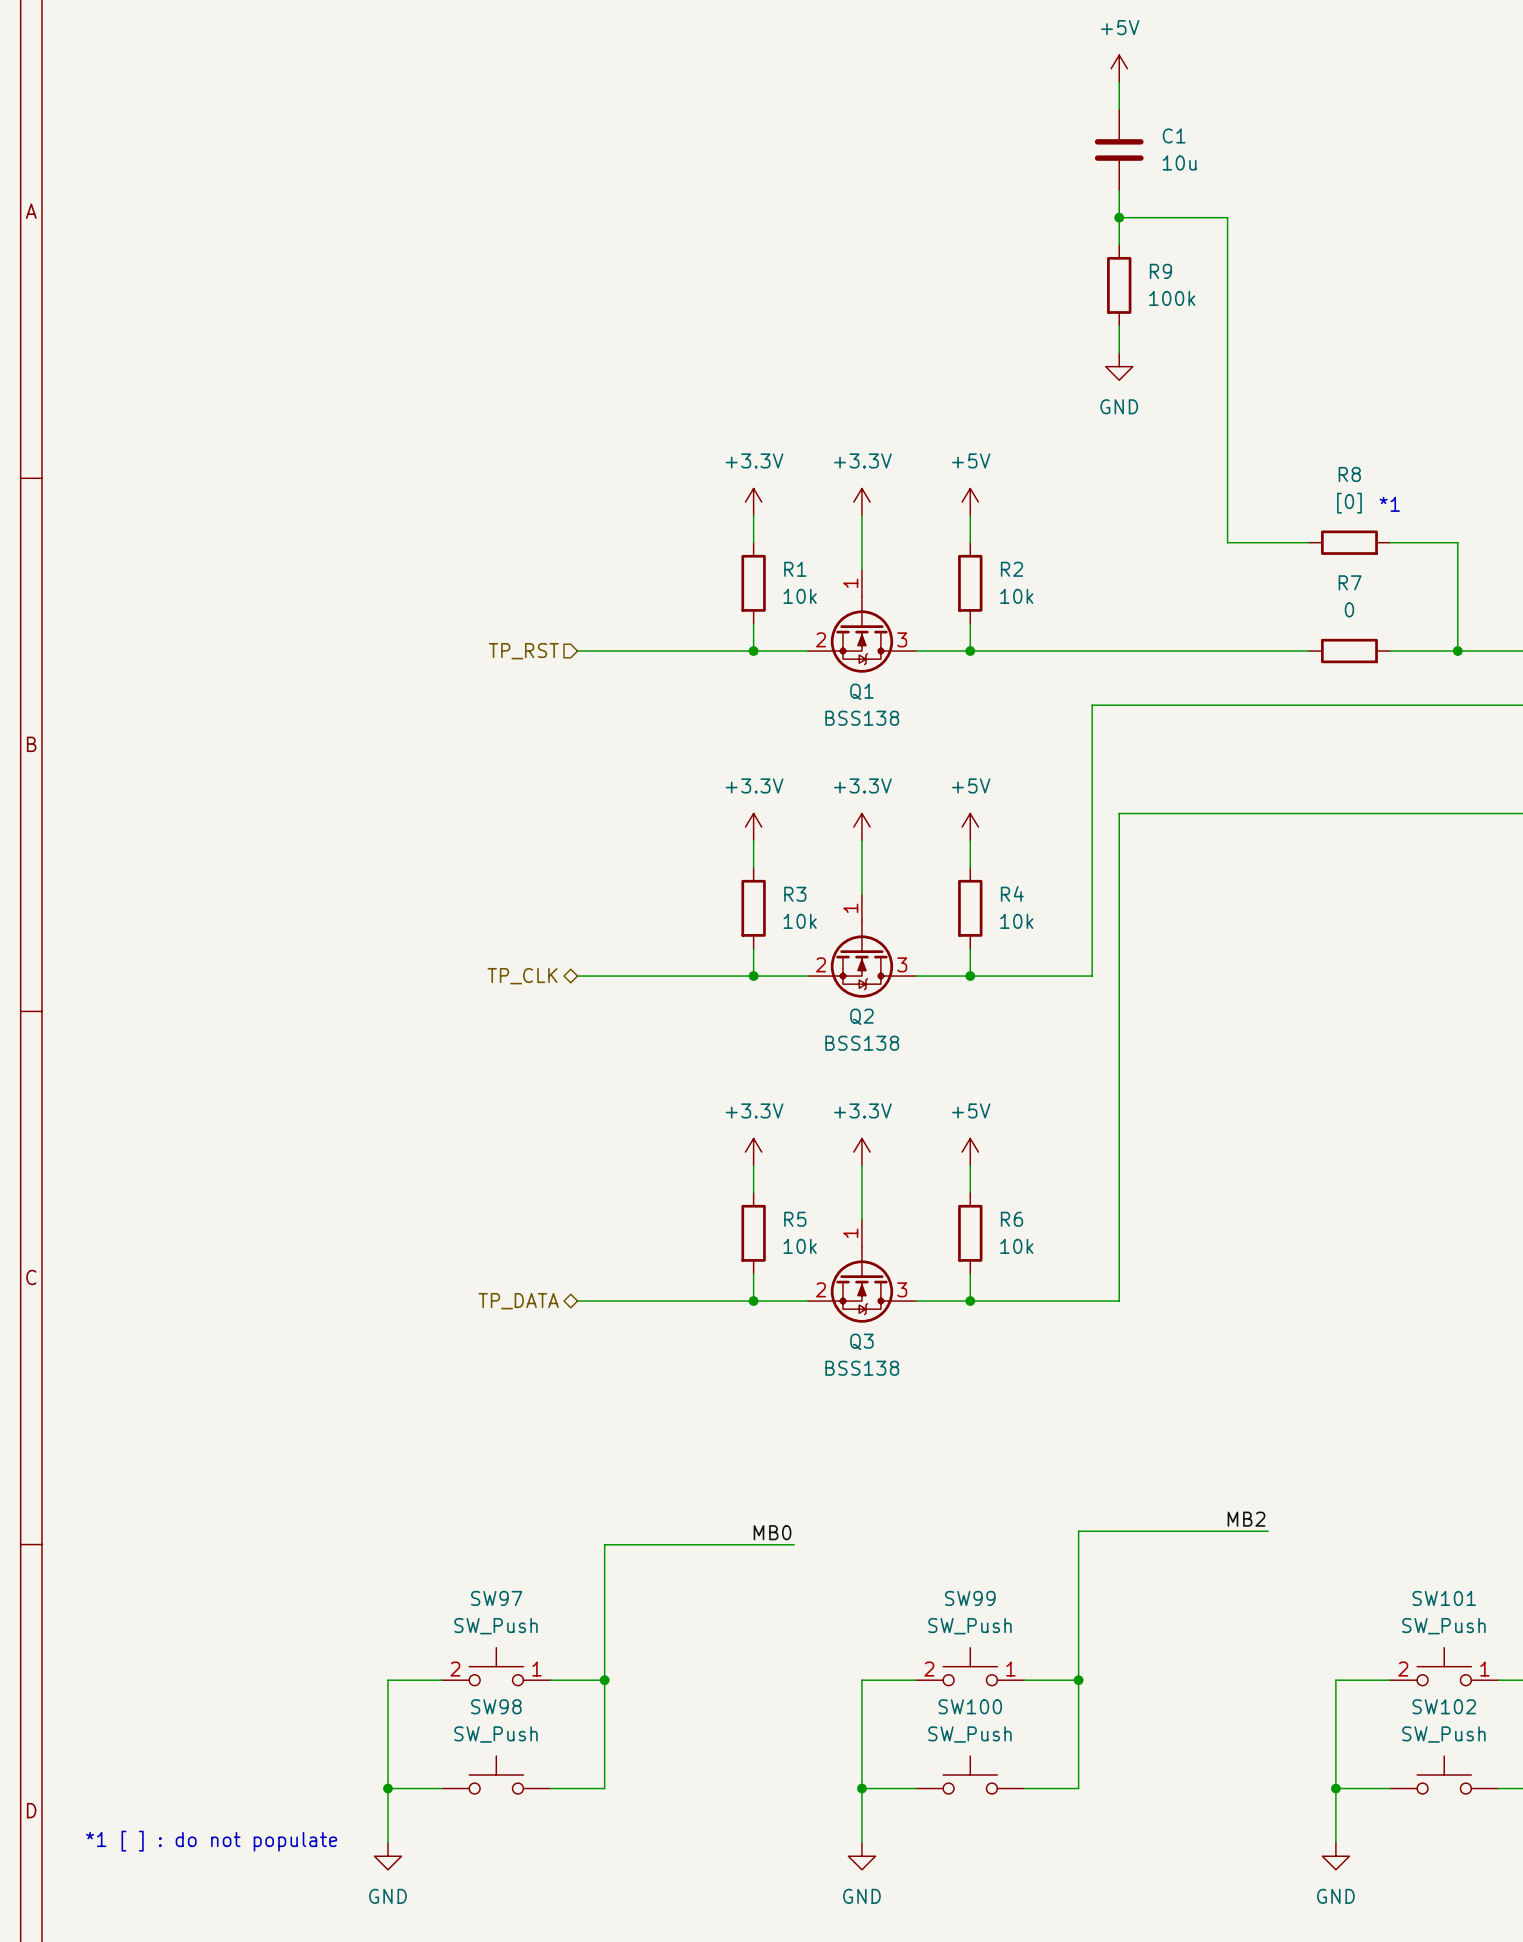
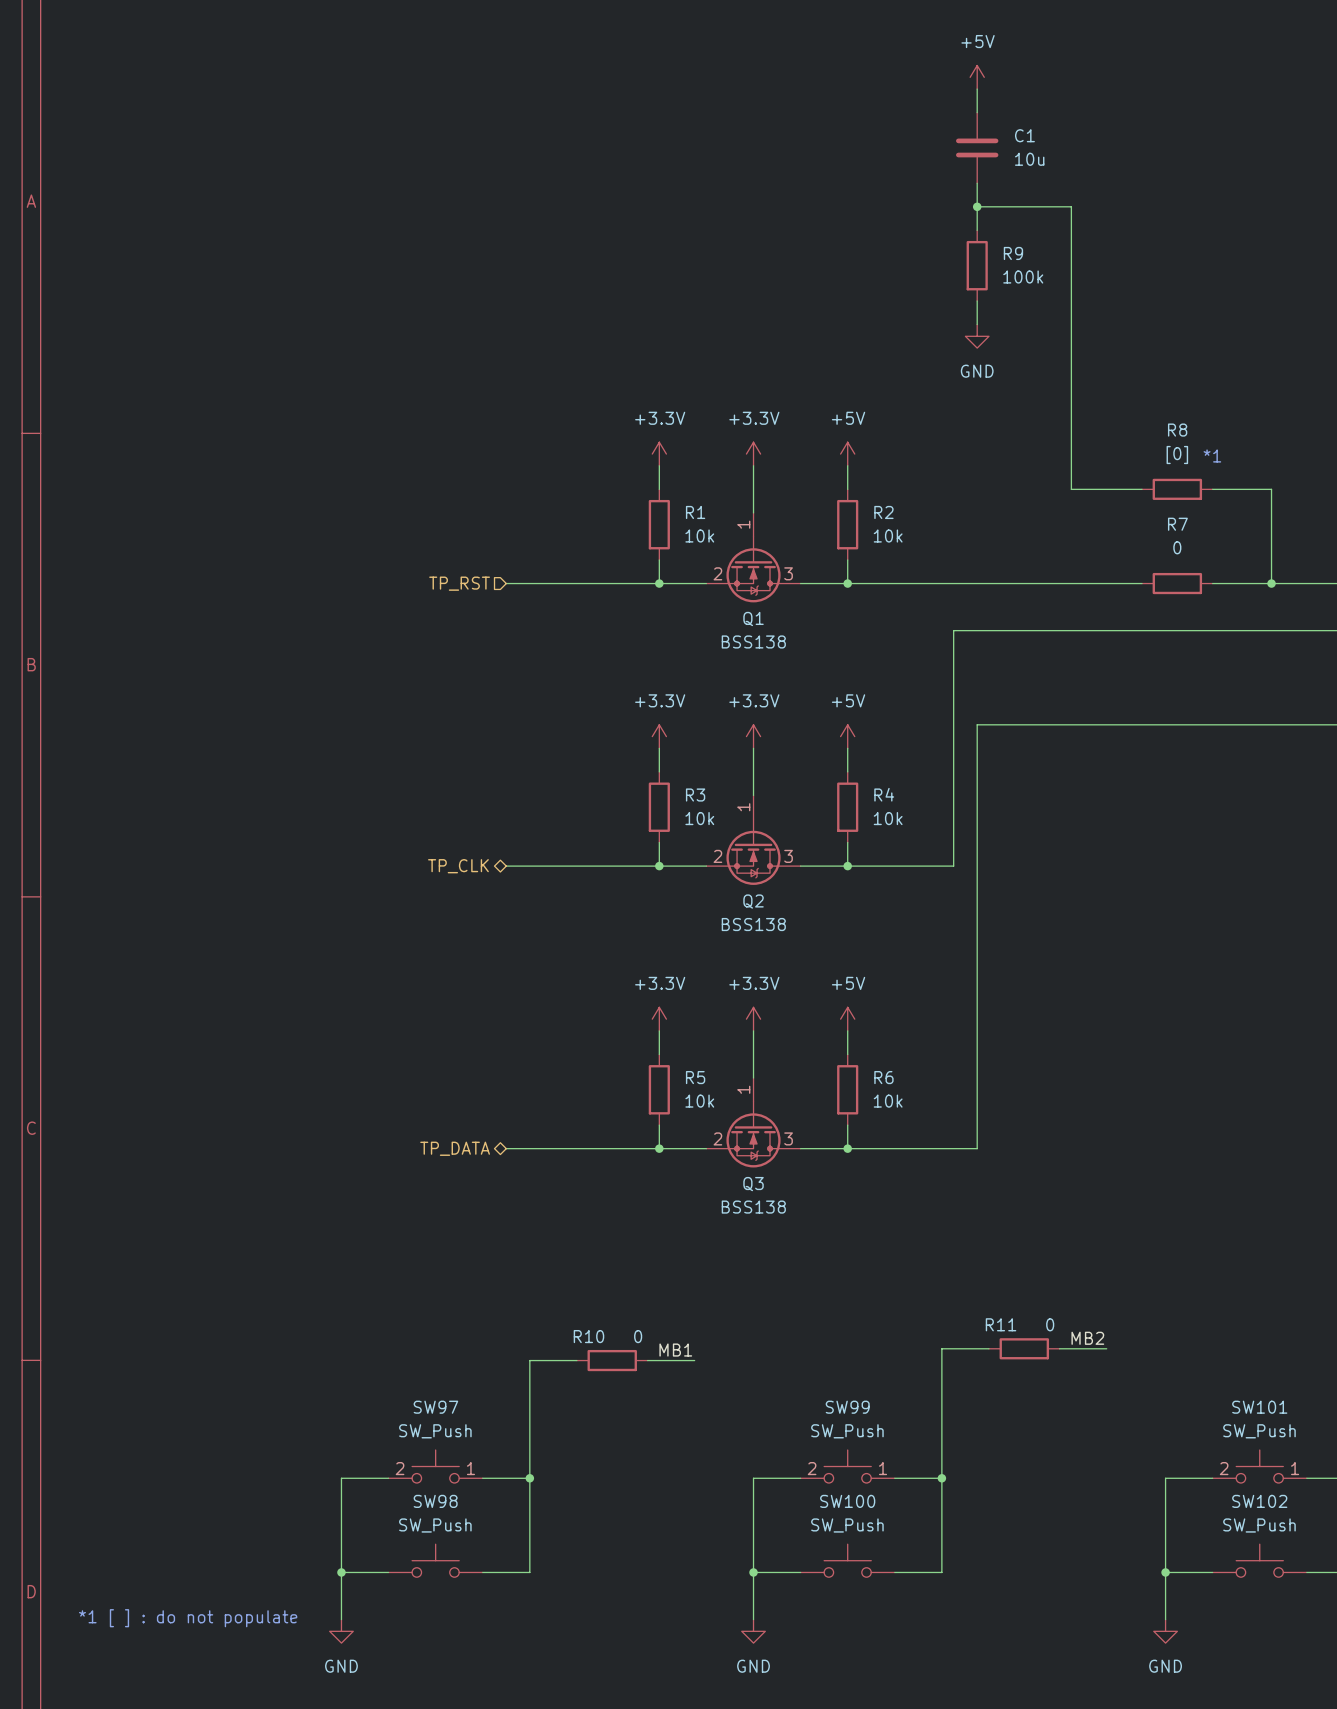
wire: (1132, 1531) (1214, 1531) -> none
R11: none -> 0 (1024, 1348)
label: MB0 (772, 1532) -> MB1 (675, 1350)
wire: (658, 1544) (740, 1544) -> none
R10: none -> 0 (612, 1360)

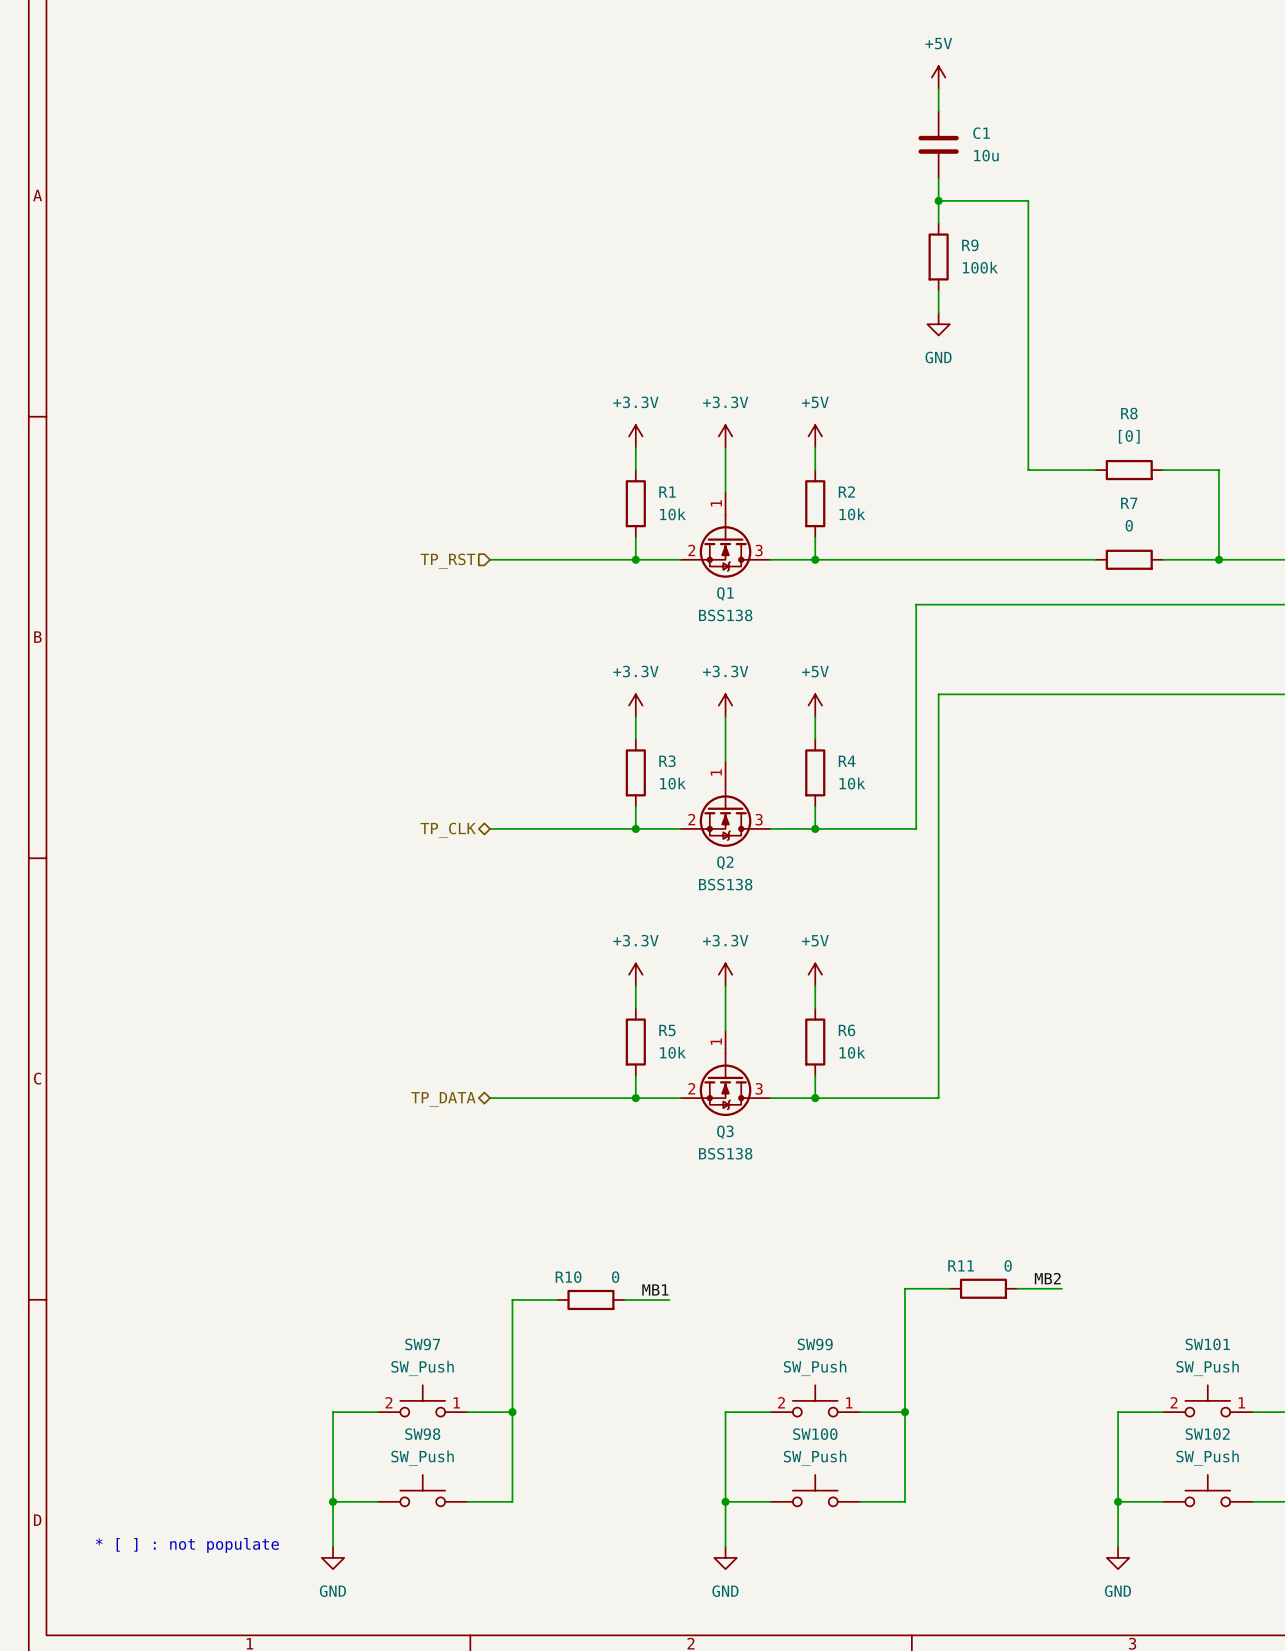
text: *1 (1212, 455) -> none
text: *1 [ ] : do not populate (188, 1618) -> * [ ] : not populate (187, 1545)

